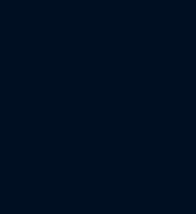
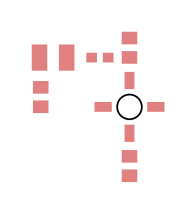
part: none -> (129, 47)
part: none -> (53, 57)
part: none -> (99, 57)
part: none -> (40, 97)
part: none -> (129, 106)
part: none -> (129, 166)

